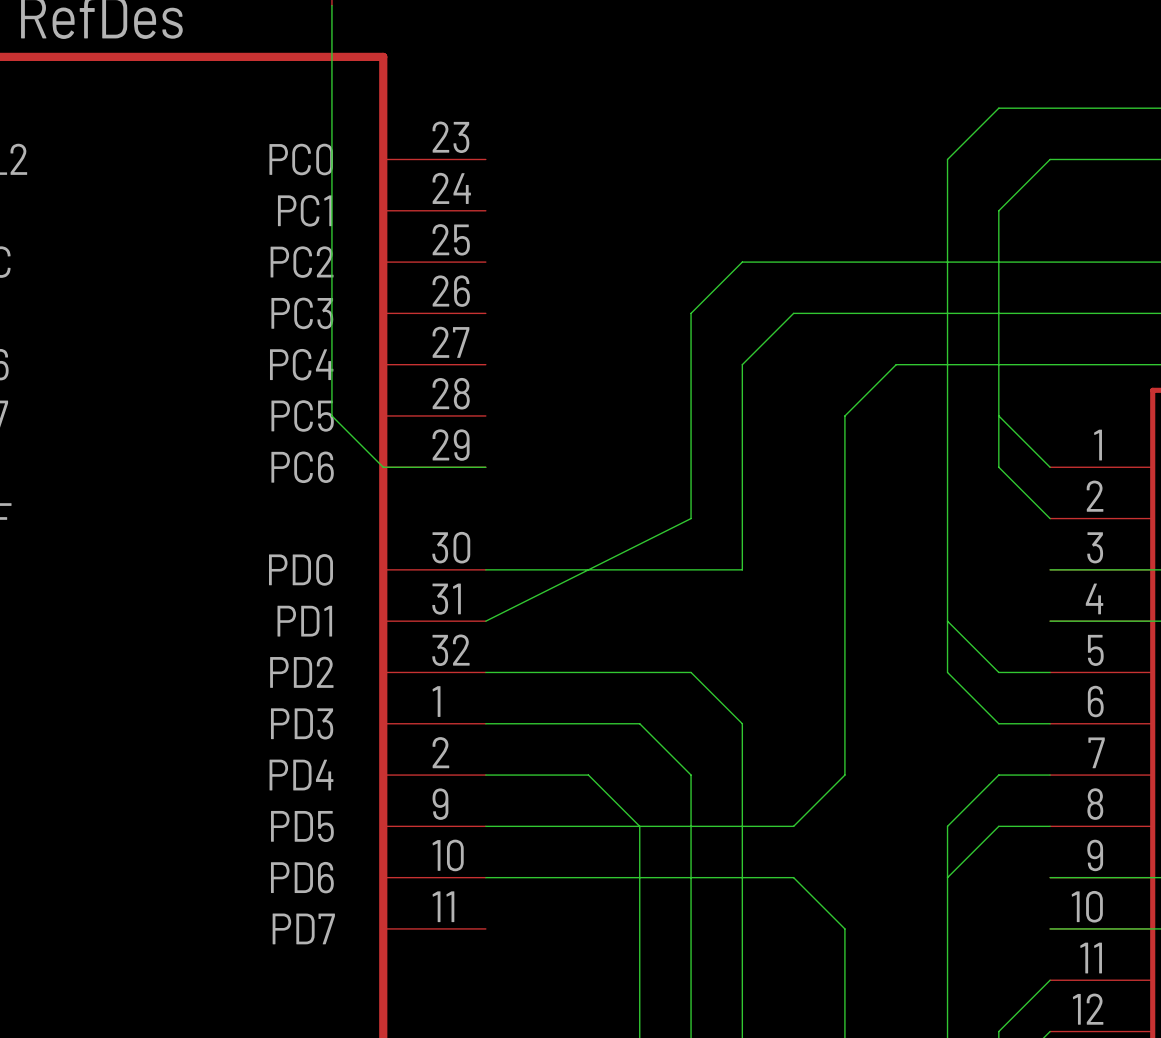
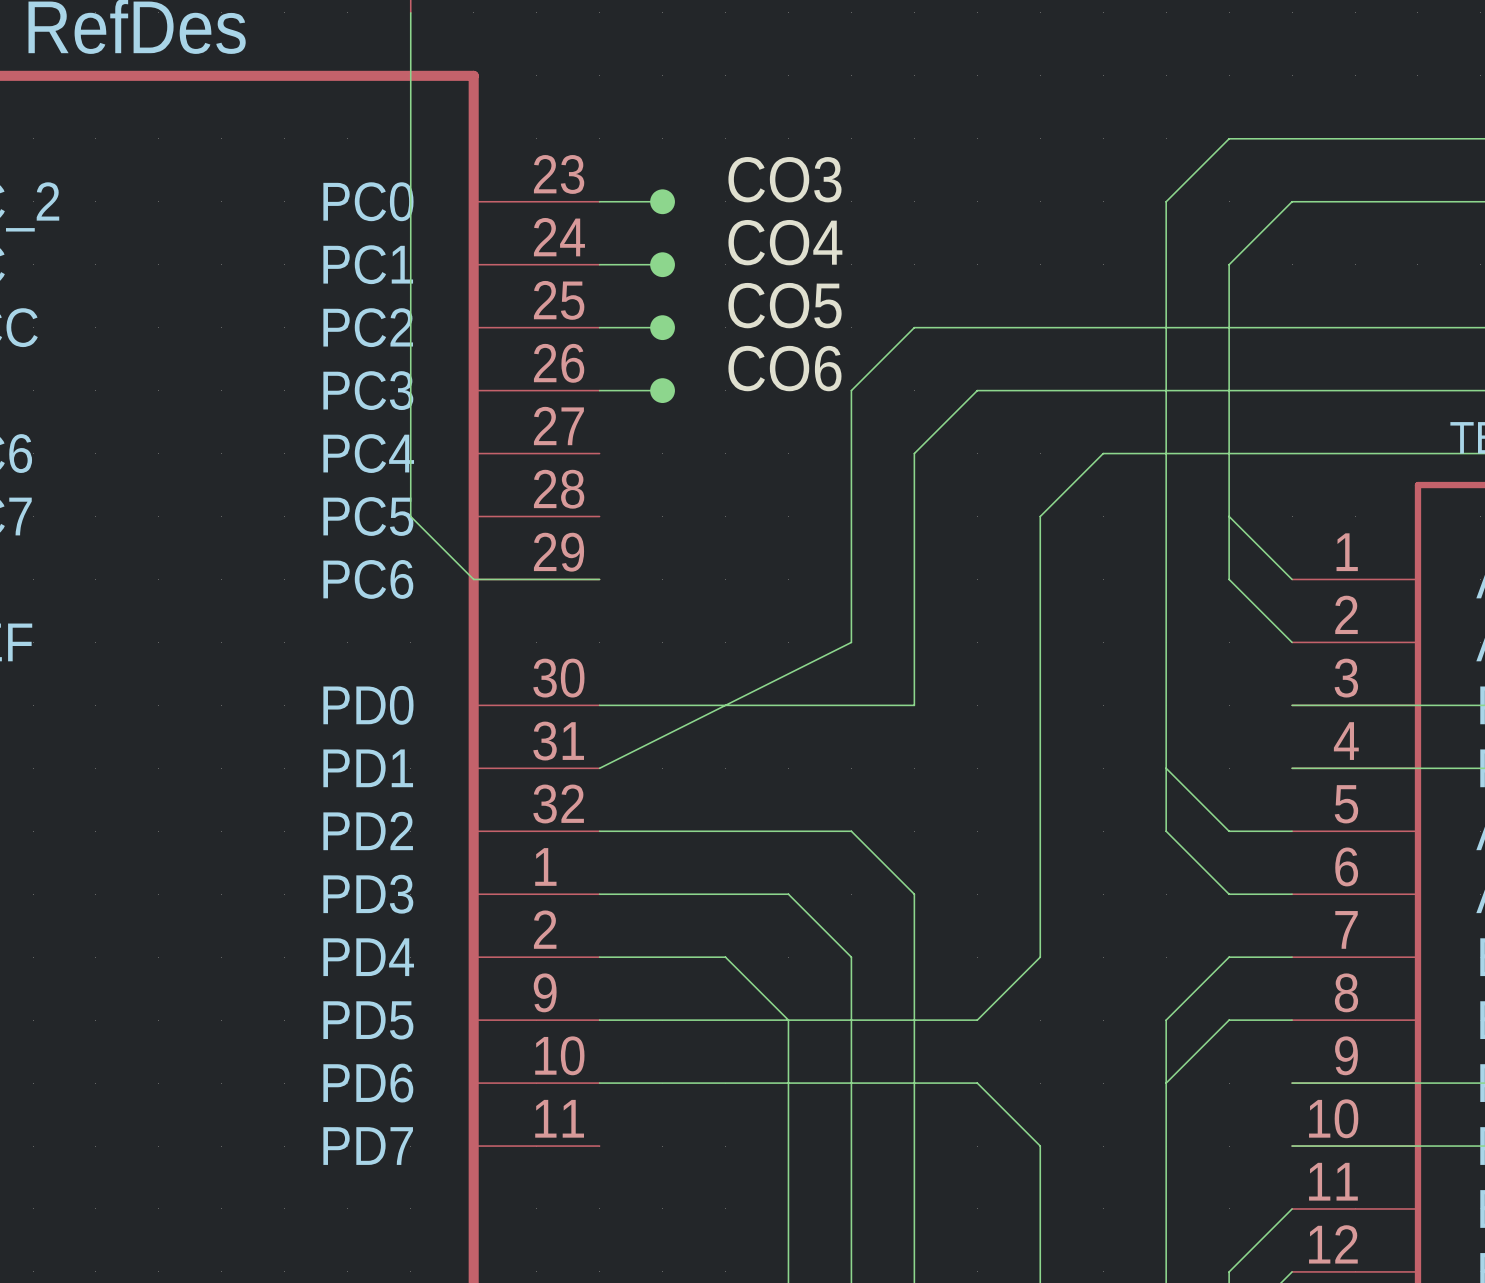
label: none -> CO3 (784, 179)
wire: none -> (599, 201) (662, 201)
junction: none -> (662, 201)
label: none -> CO4 (785, 242)
wire: none -> (599, 264) (662, 264)
junction: none -> (662, 264)
label: none -> CO5 (785, 305)
wire: none -> (599, 327) (662, 327)
junction: none -> (662, 327)
label: none -> CO6 (784, 368)
wire: none -> (599, 390) (662, 390)
junction: none -> (662, 390)

